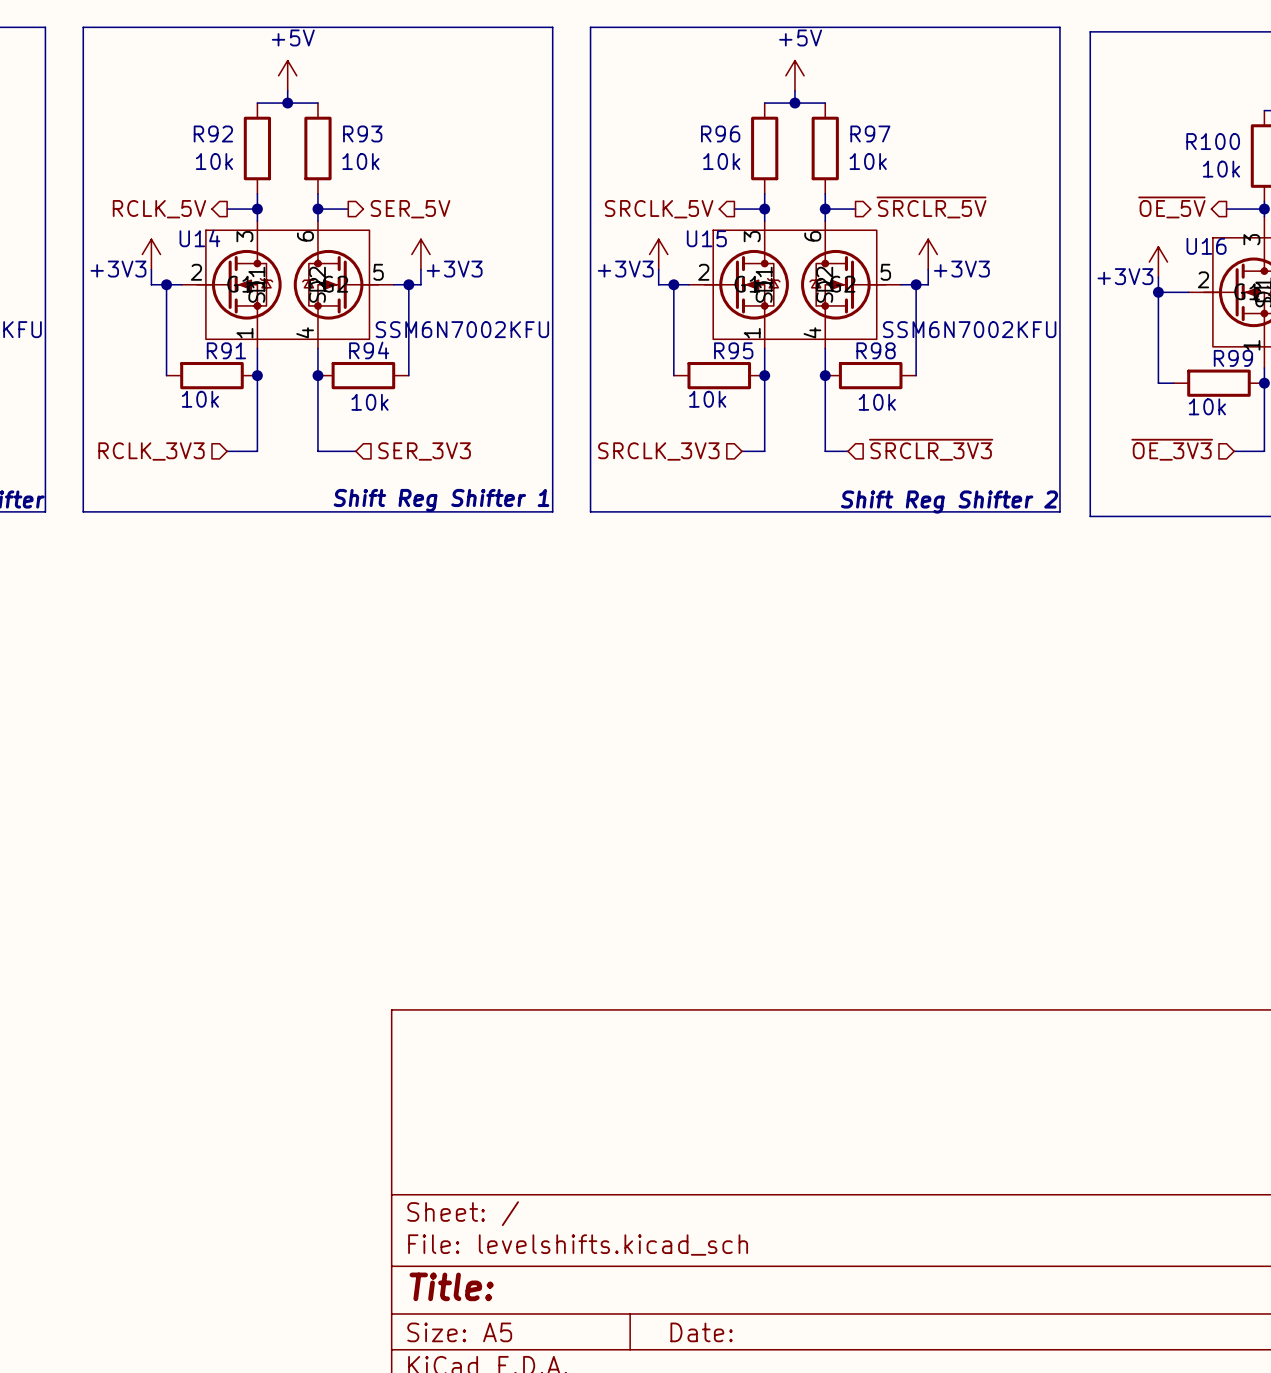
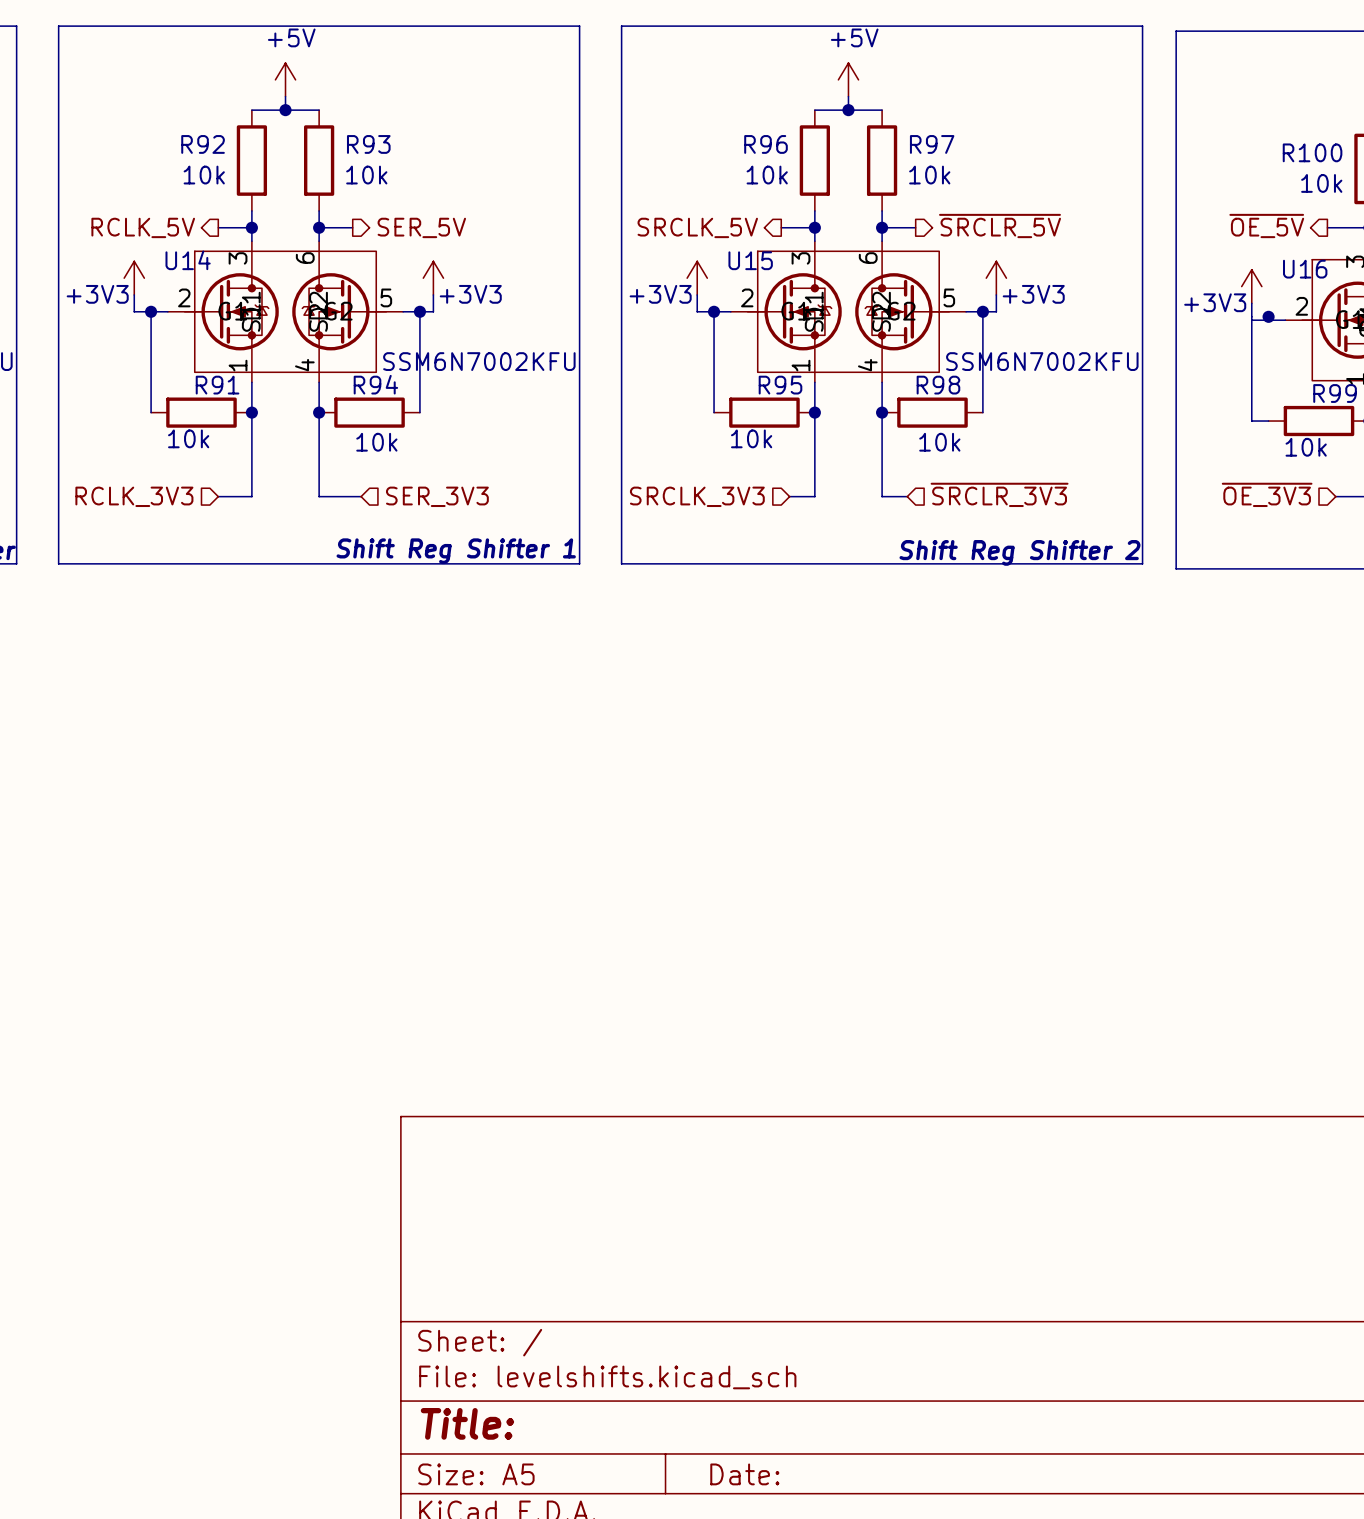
junction position: (1158, 292) -> (1268, 316)

